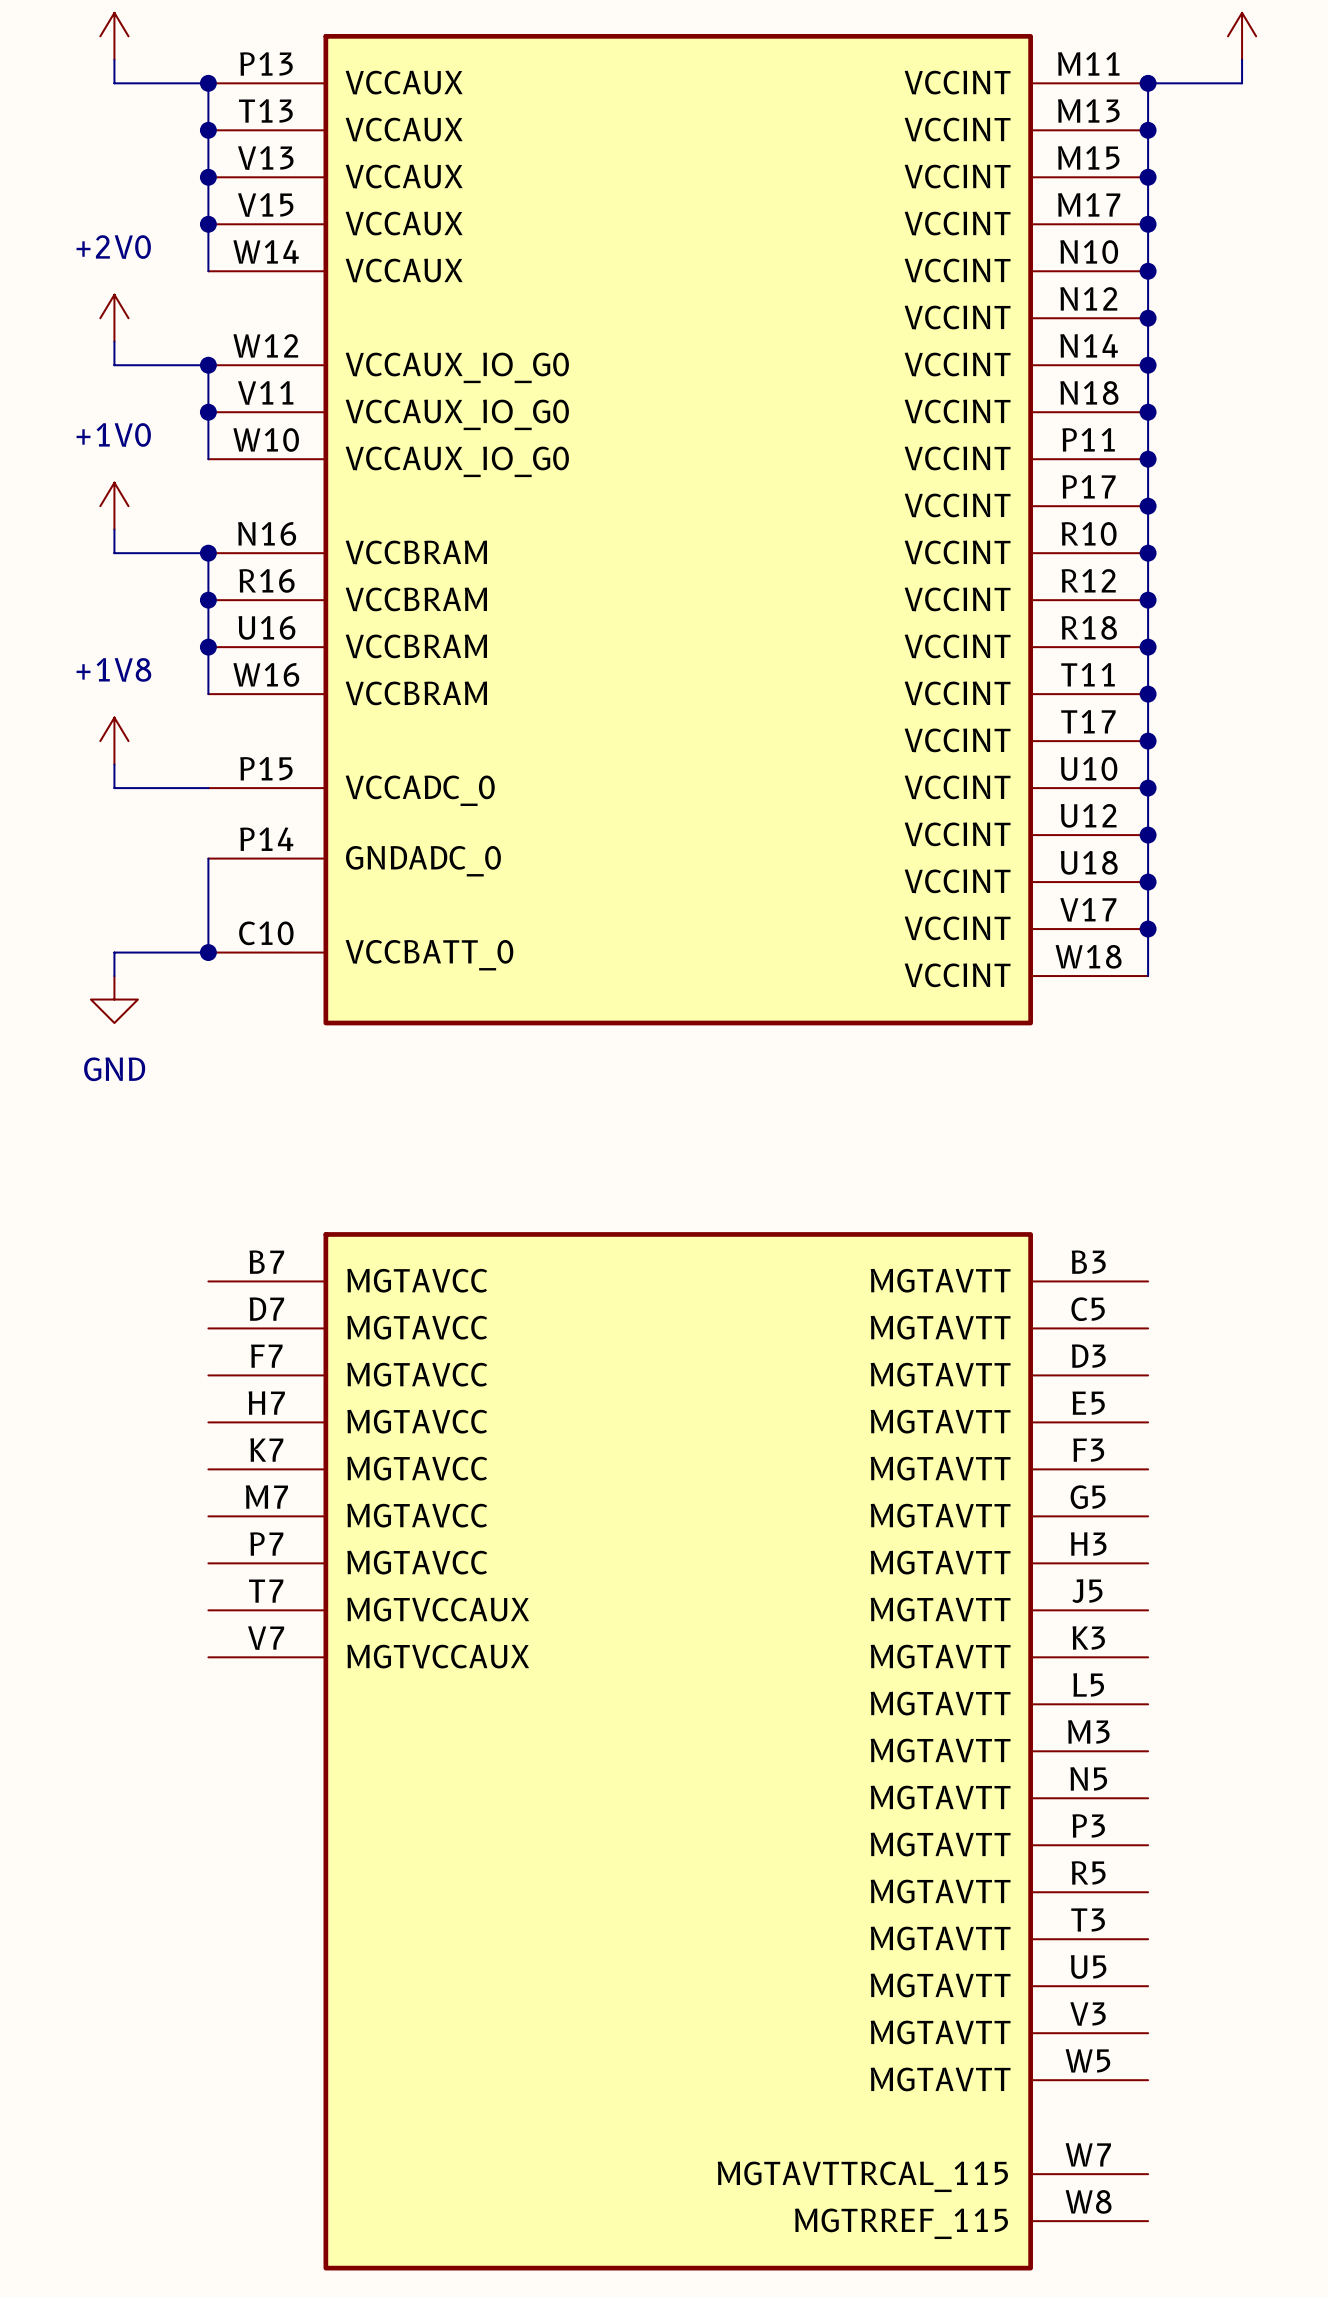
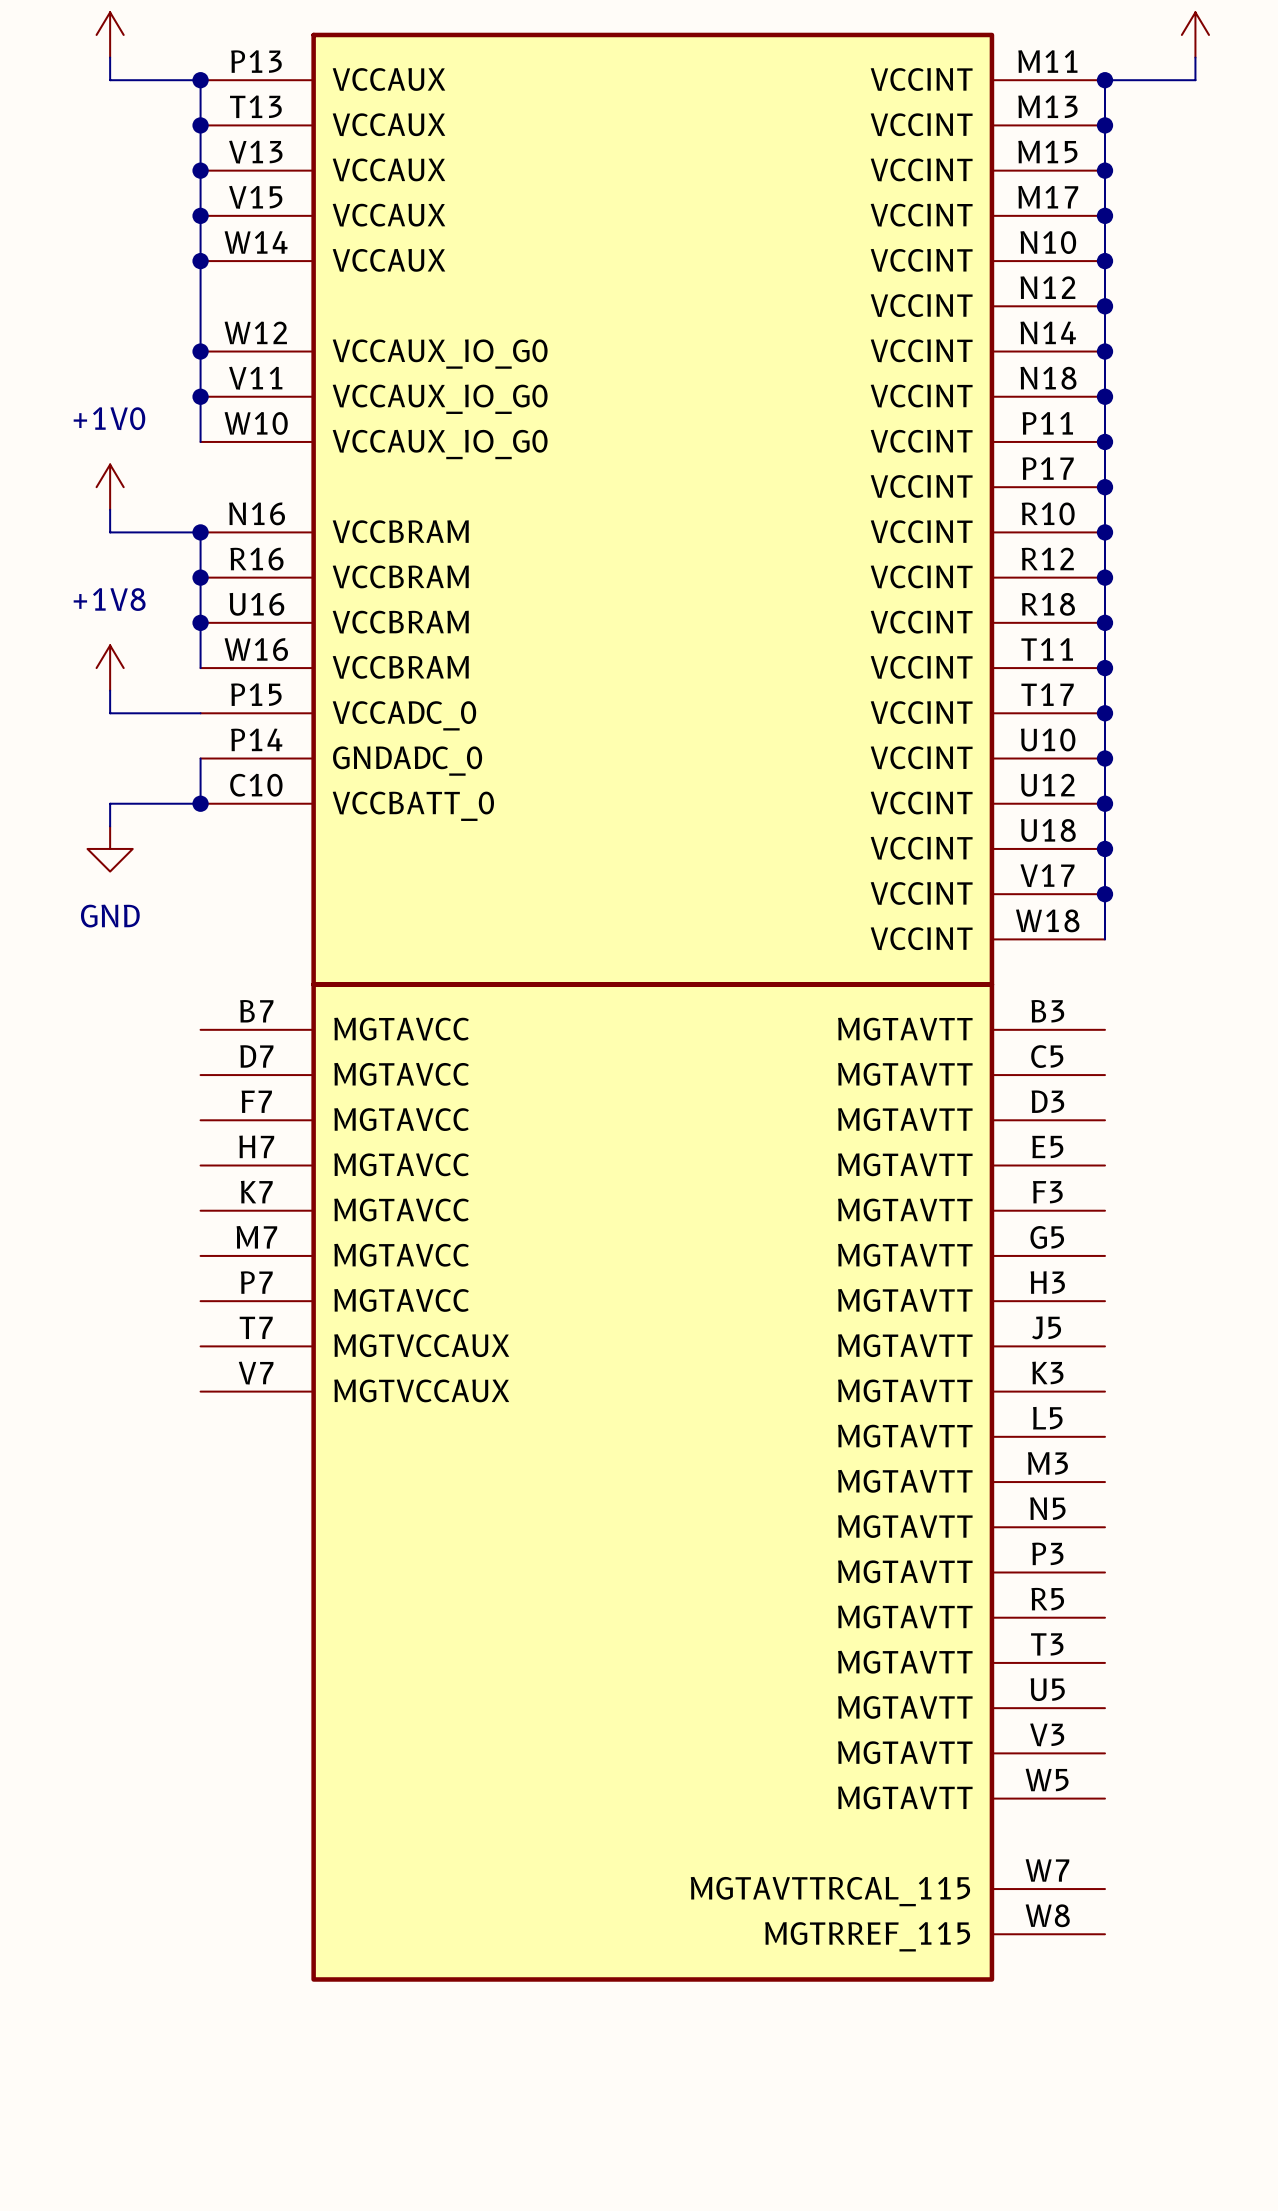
part symbol: [208, 33, 1149, 1026] -> [200, 32, 1105, 987]
junction: none -> (200, 261)
power symbol: +2V0 (114, 318) -> none
wire: (114, 341) (114, 365) (208, 365) -> (200, 261) (200, 351)
wire: none -> (110, 690) (110, 713) (200, 713)
power symbol position: +1V8 (114, 741) -> +1V8 (110, 668)
wire: (114, 764) (114, 788) (208, 788) -> (110, 826) (110, 803) (200, 803) (200, 758)
junction: none -> (200, 803)
wire: (208, 858) (208, 952) (114, 952) (114, 976) -> none
junction: (208, 952) -> none
power symbol position: GND (114, 999) -> GND (110, 848)
part position: (678, 1751) -> (652, 1482)

